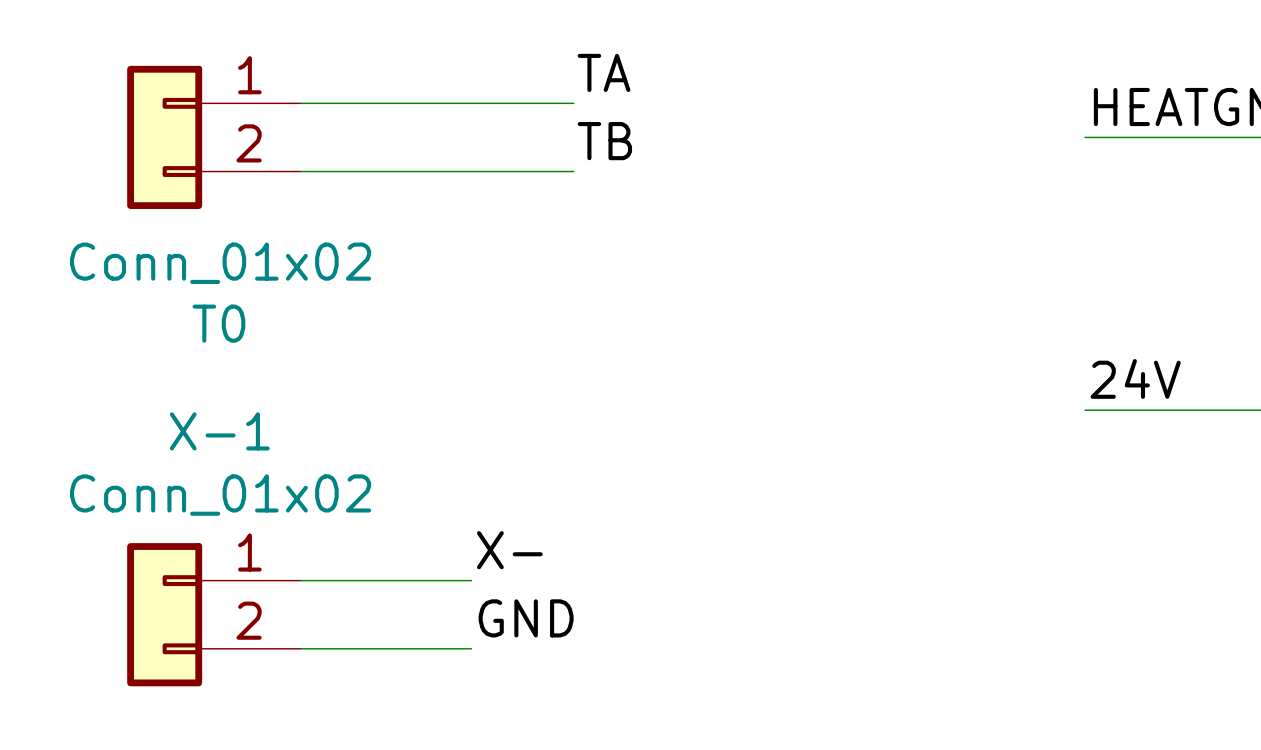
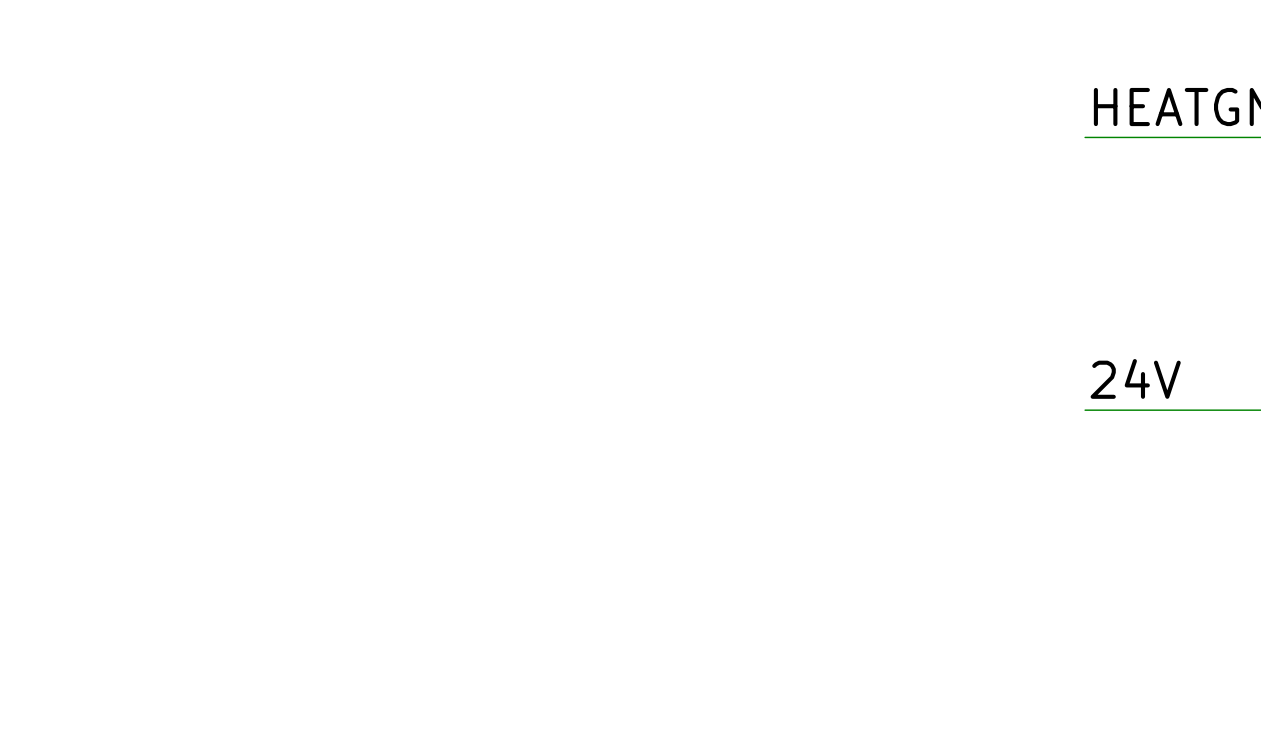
label: TA (604, 72) -> none
wire: (301, 103) (573, 103) -> none
T0: Conn_01x02 (214, 137) -> none
label: TB (604, 141) -> none
wire: (301, 171) (573, 171) -> none
label: X- (509, 550) -> none
wire: (301, 580) (471, 580) -> none
X-1: Conn_01x02 (214, 614) -> none
label: GND (526, 618) -> none
wire: (301, 648) (471, 648) -> none

